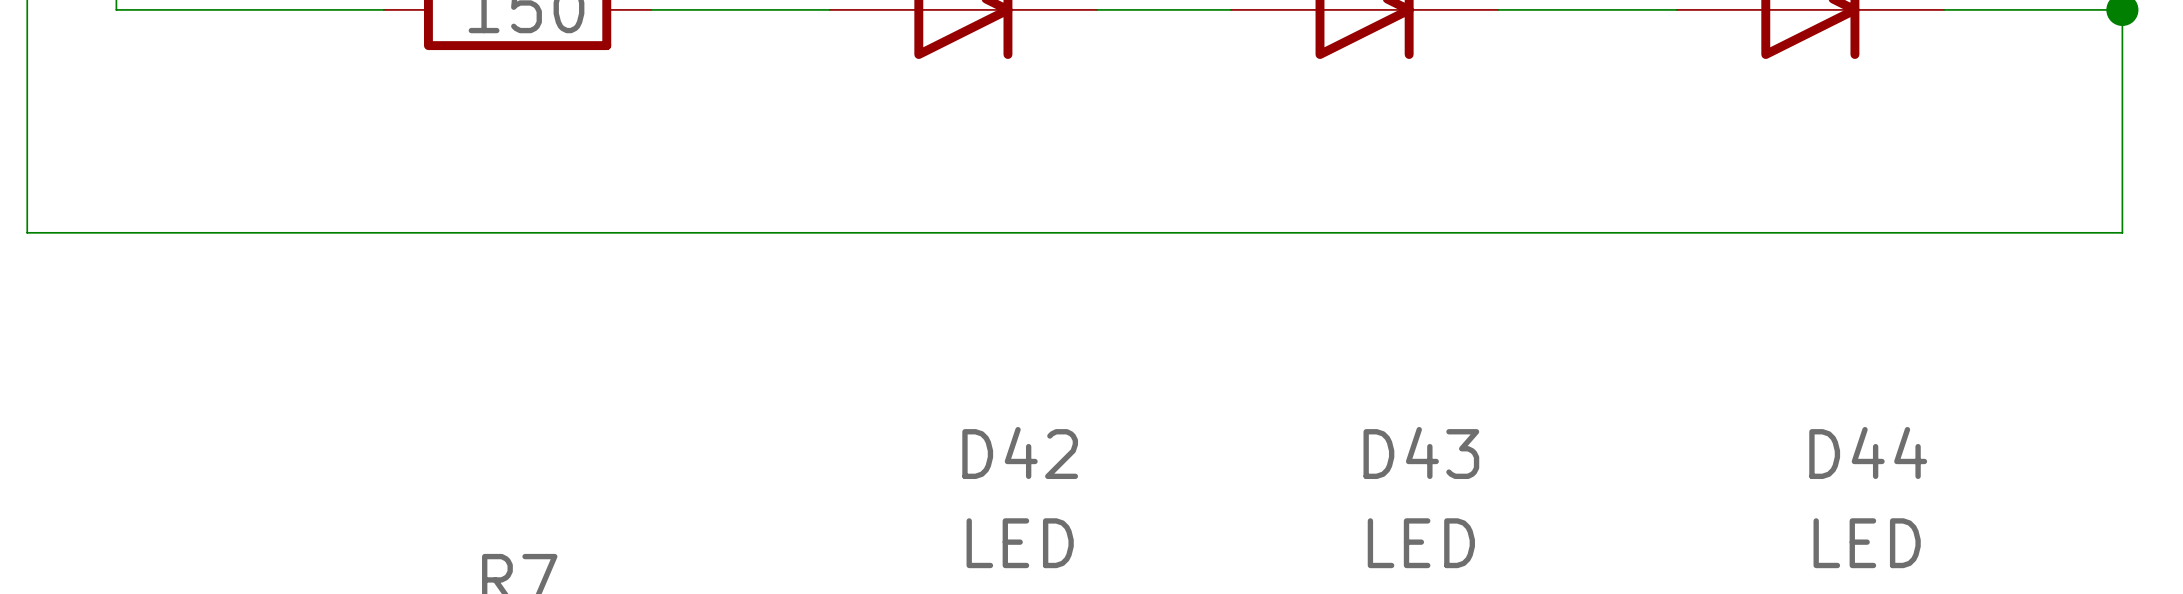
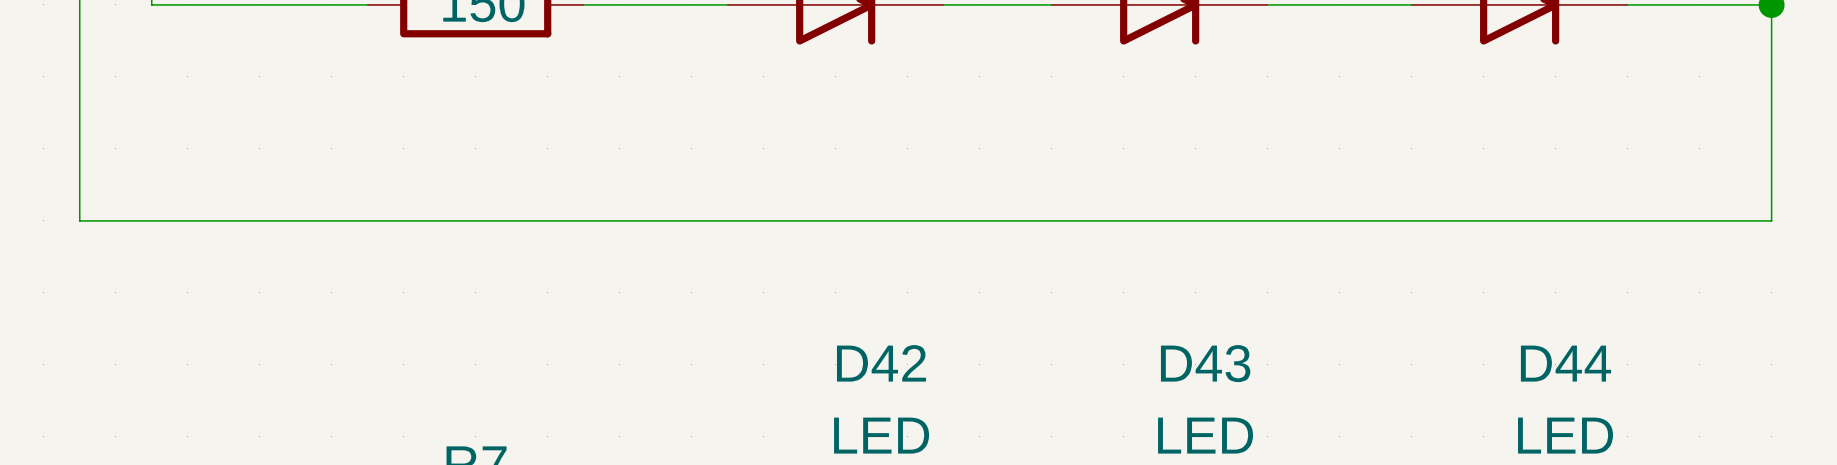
wire: (27, 232) (2122, 232) -> (79, 184) (79, 220) (1771, 220) (1771, 184)

